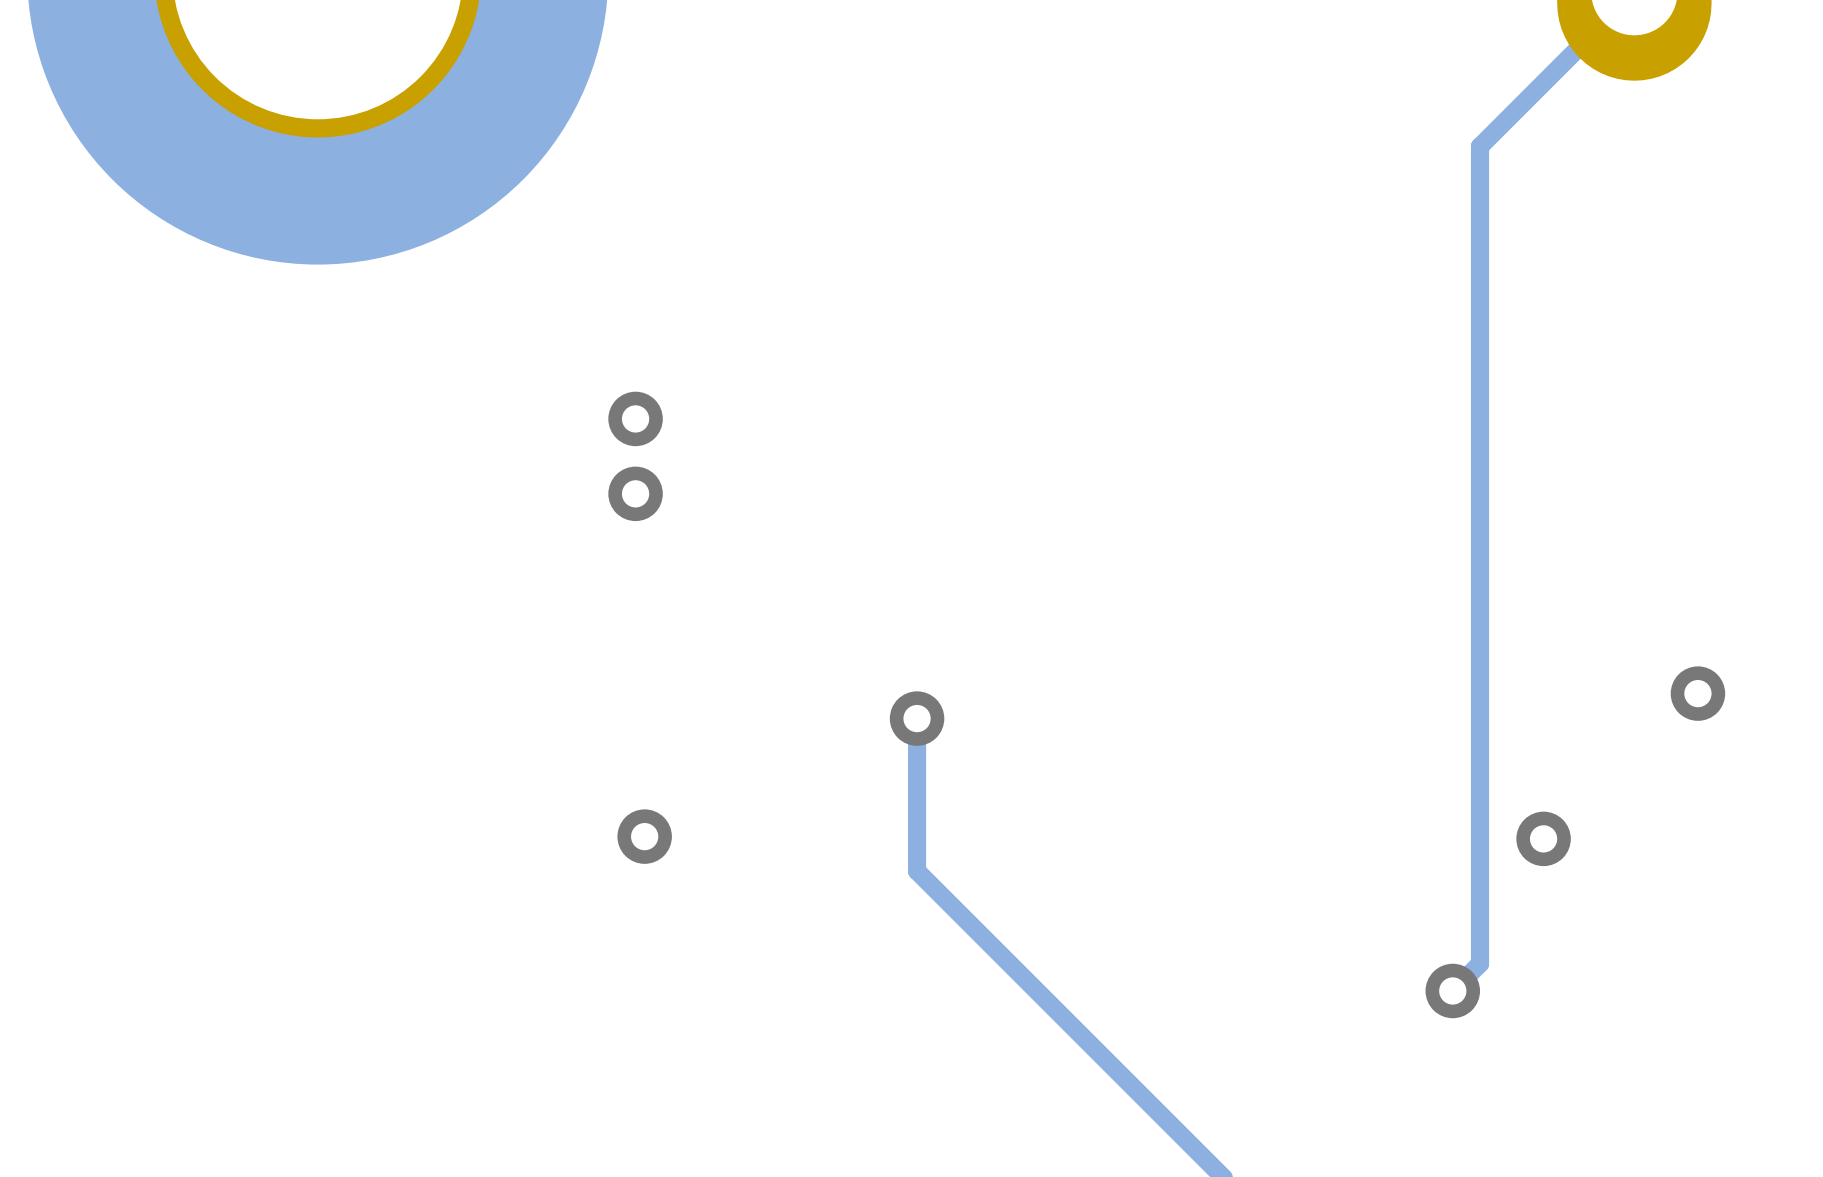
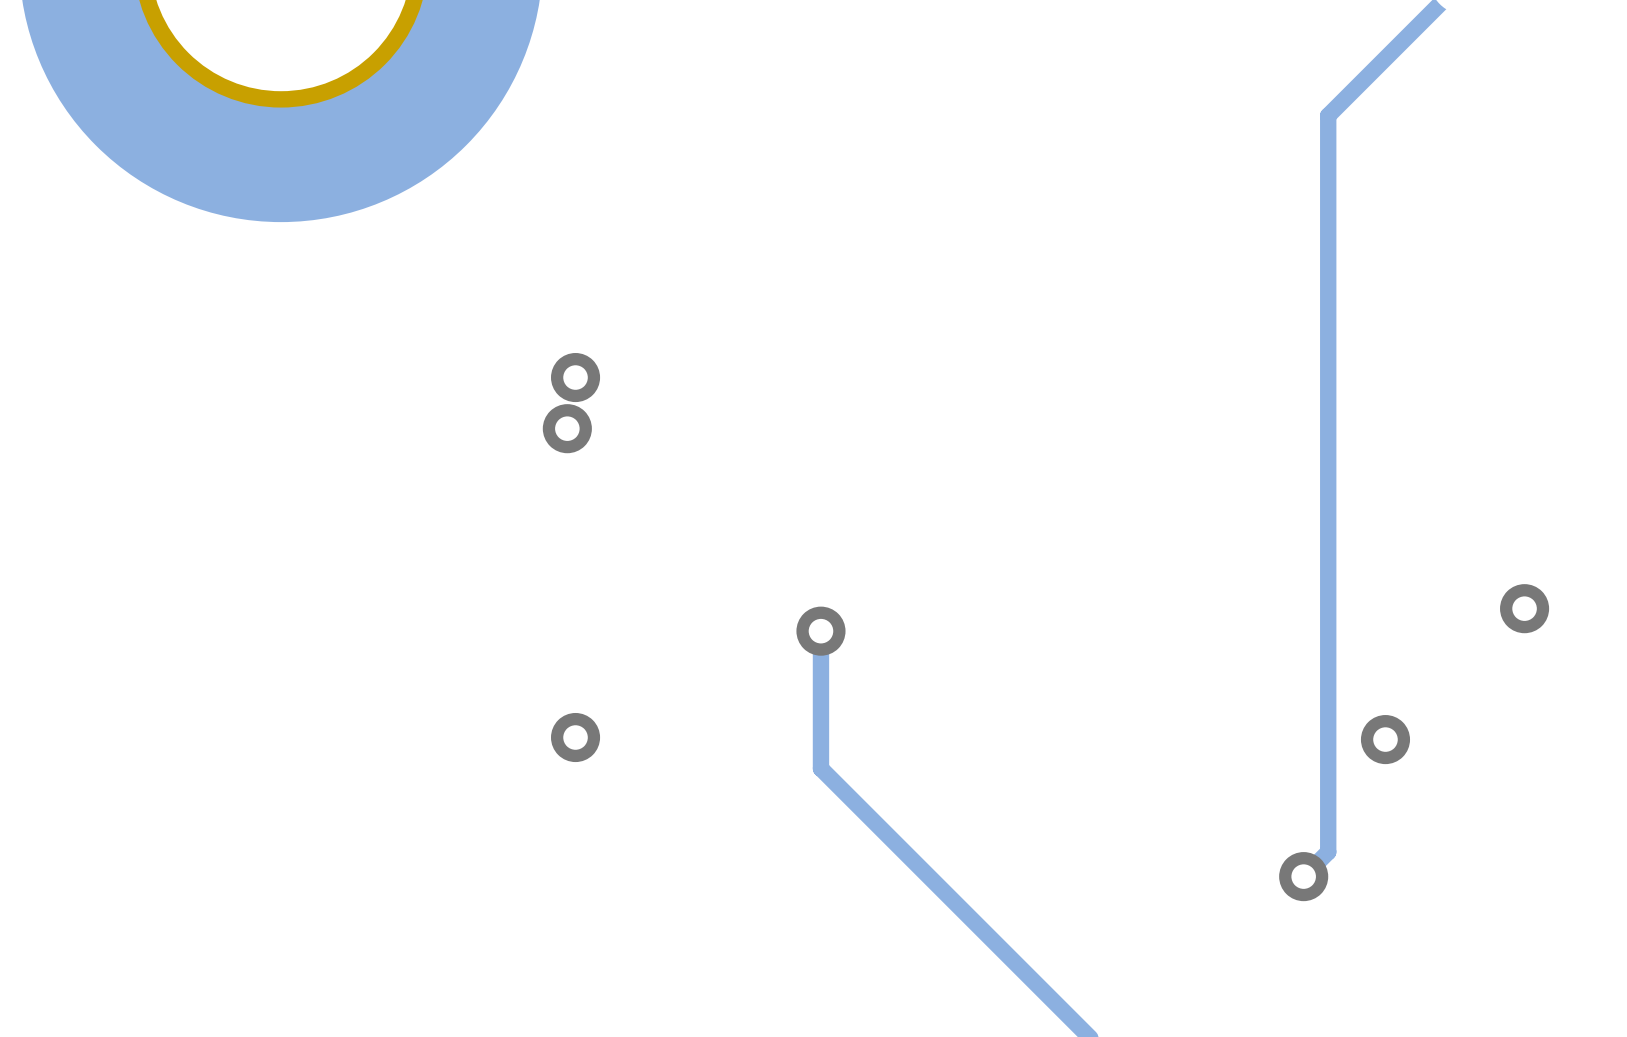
via position: (635, 418) -> (575, 377)

